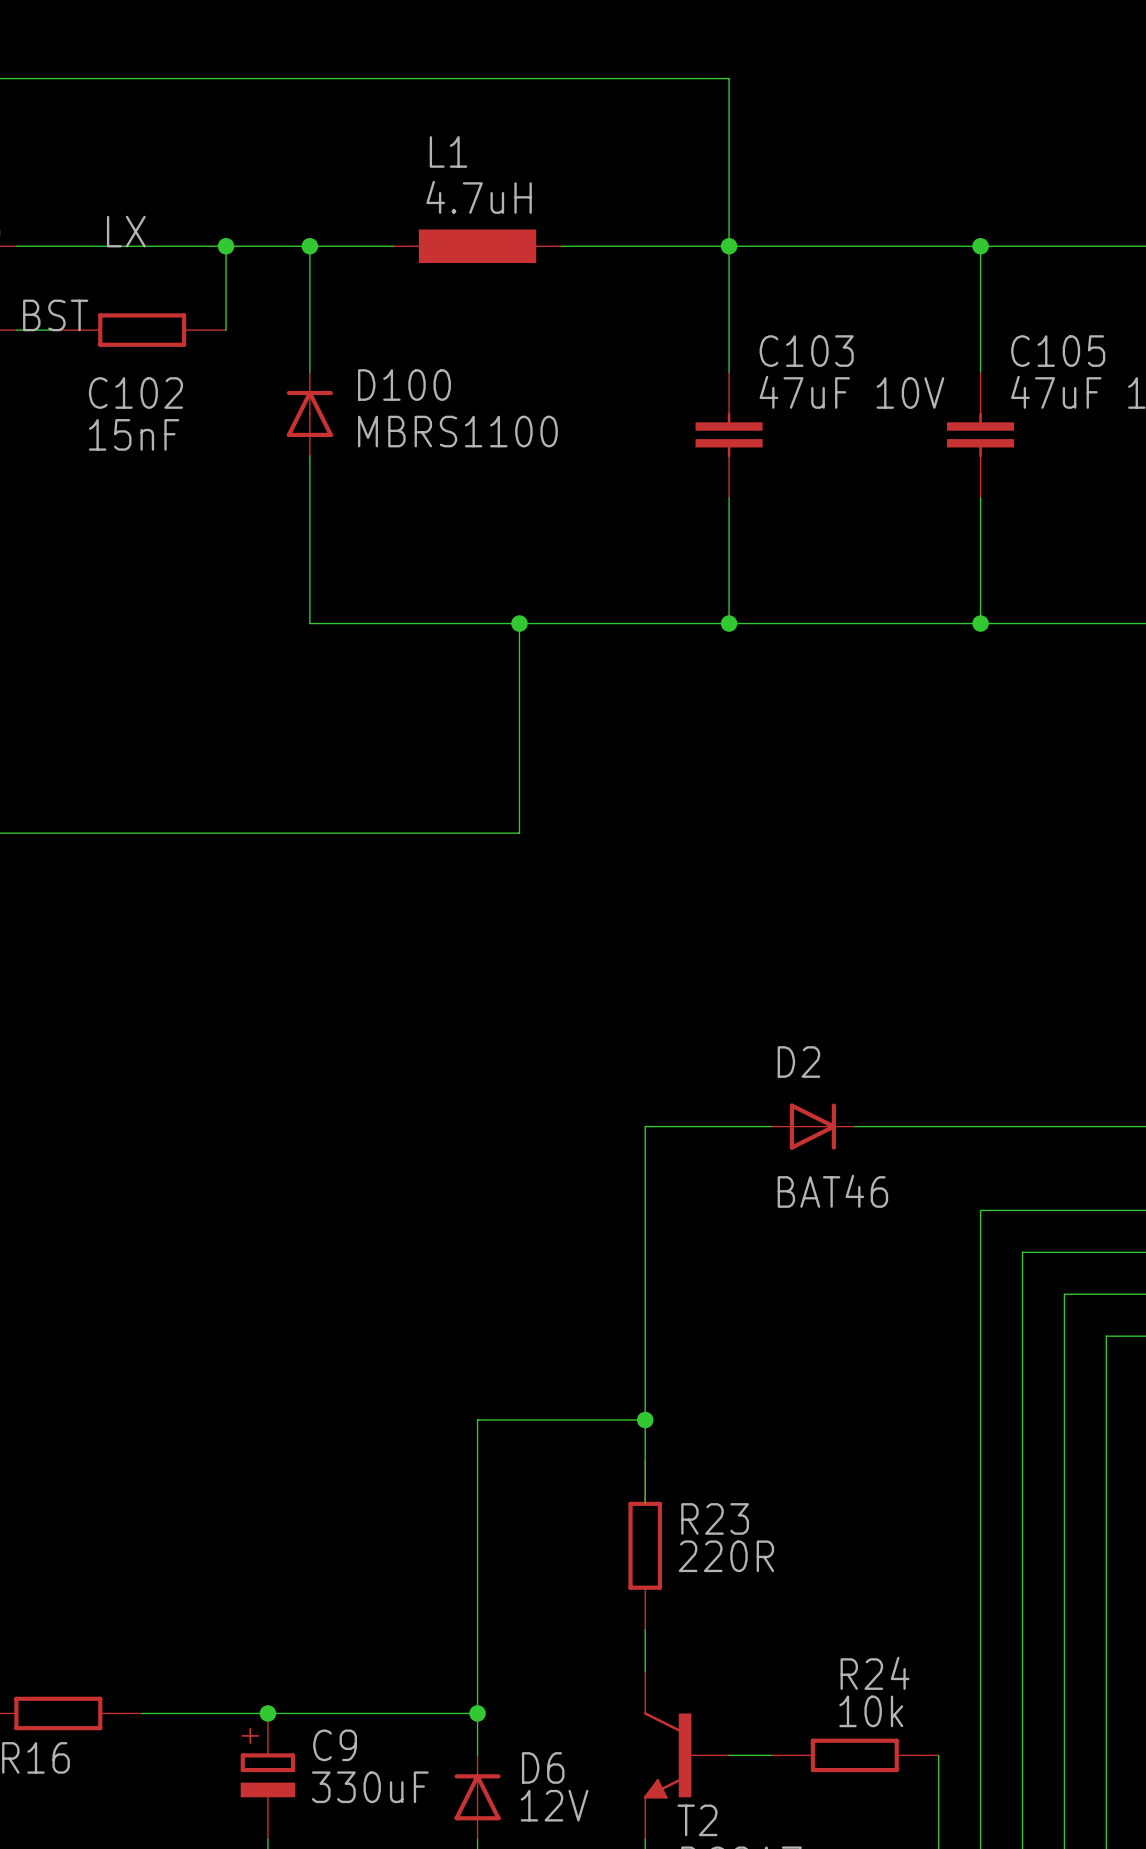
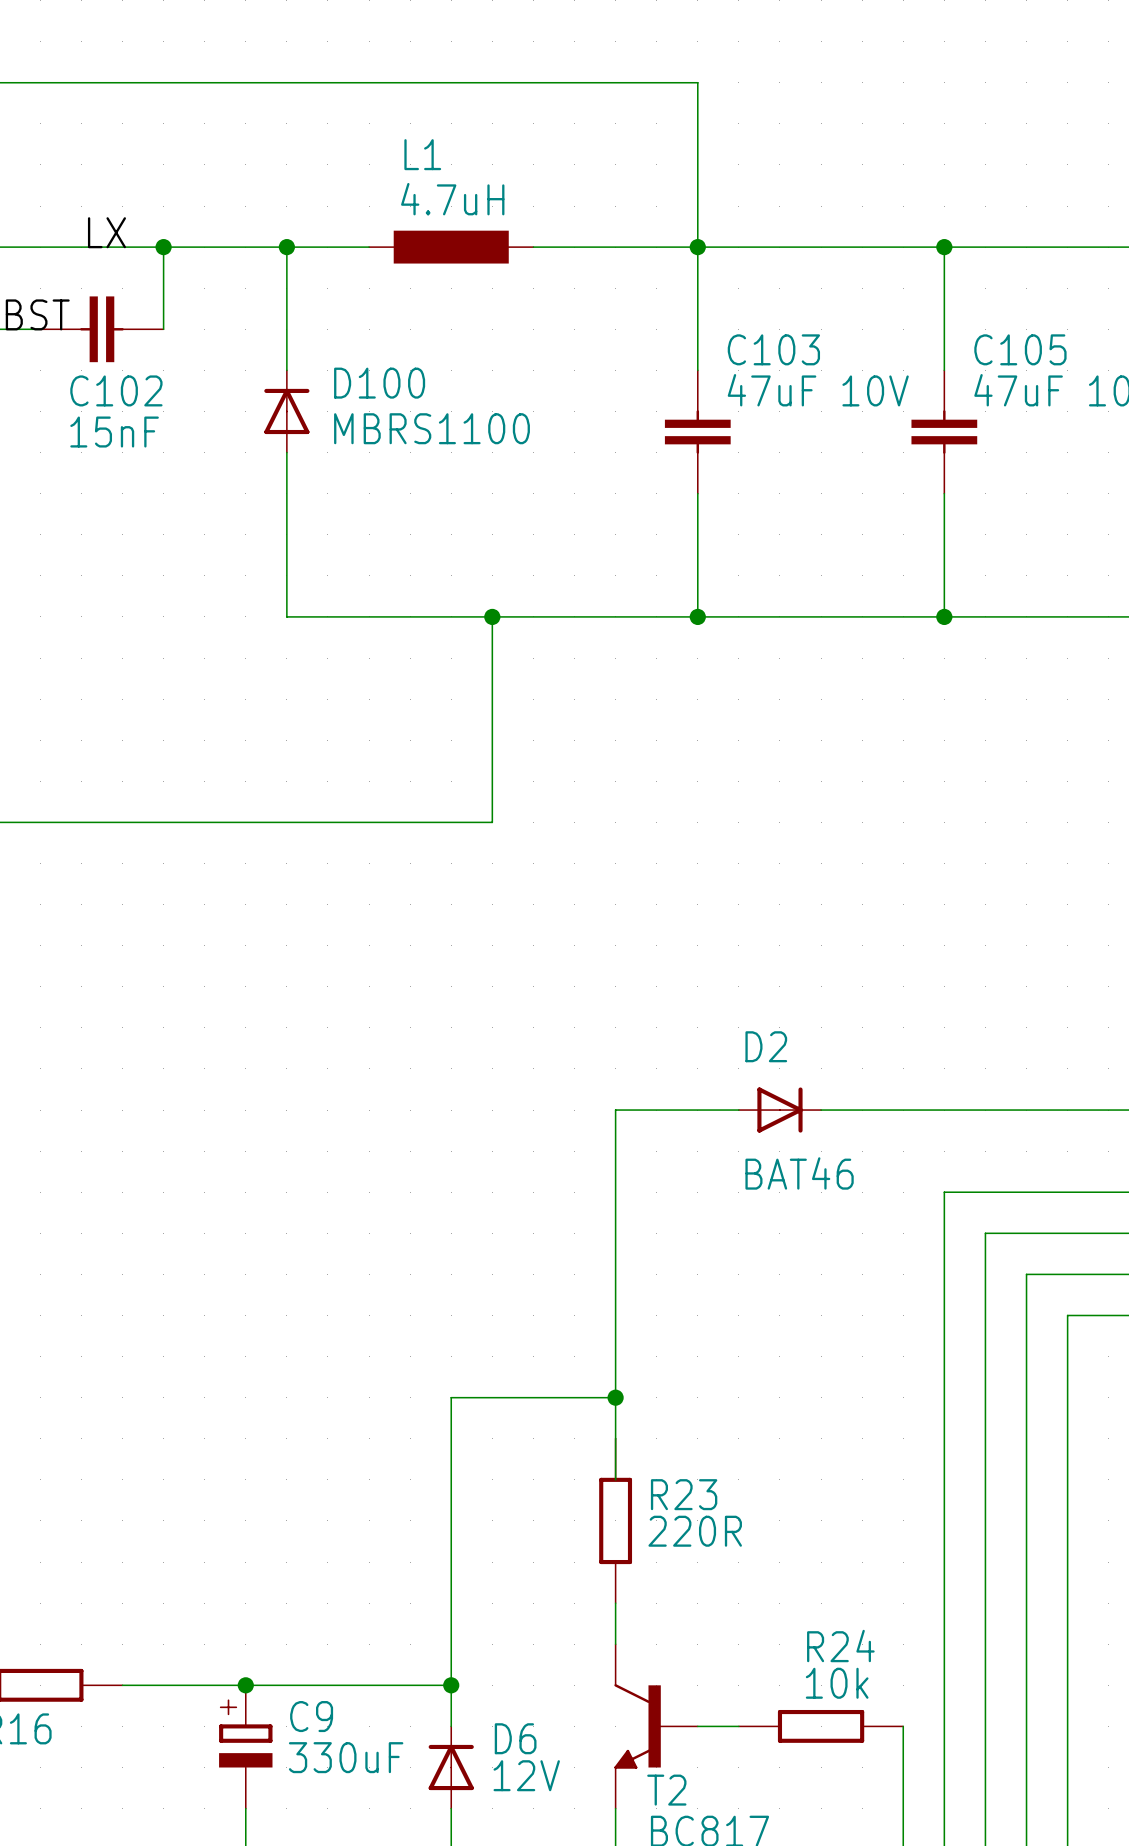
wire: (226, 246) (226, 330) -> (163, 247) (163, 329)
junction position: (226, 246) -> (163, 247)
C102 symbol: [58, 313, 227, 347] -> [40, 296, 164, 363]

